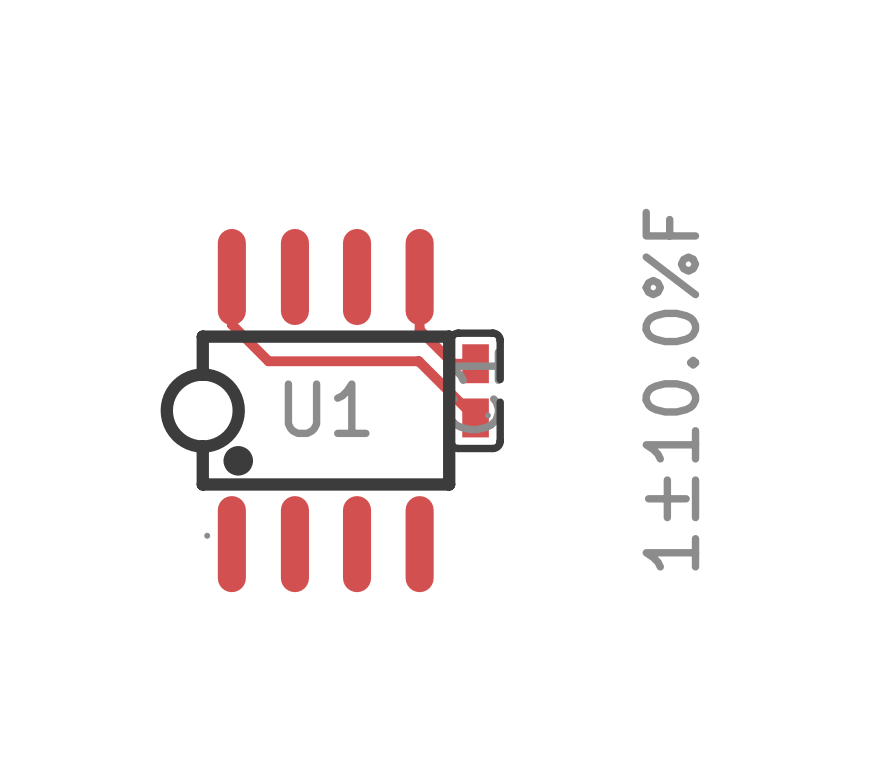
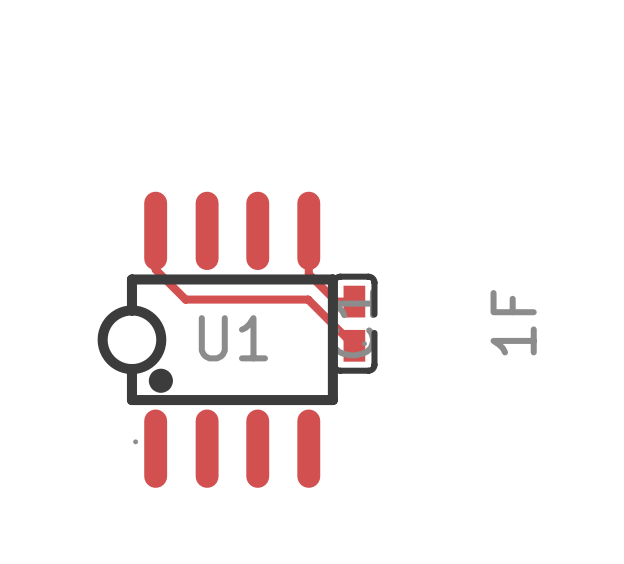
part value: 1±10.0%F (670, 389) -> 1F (513, 322)

